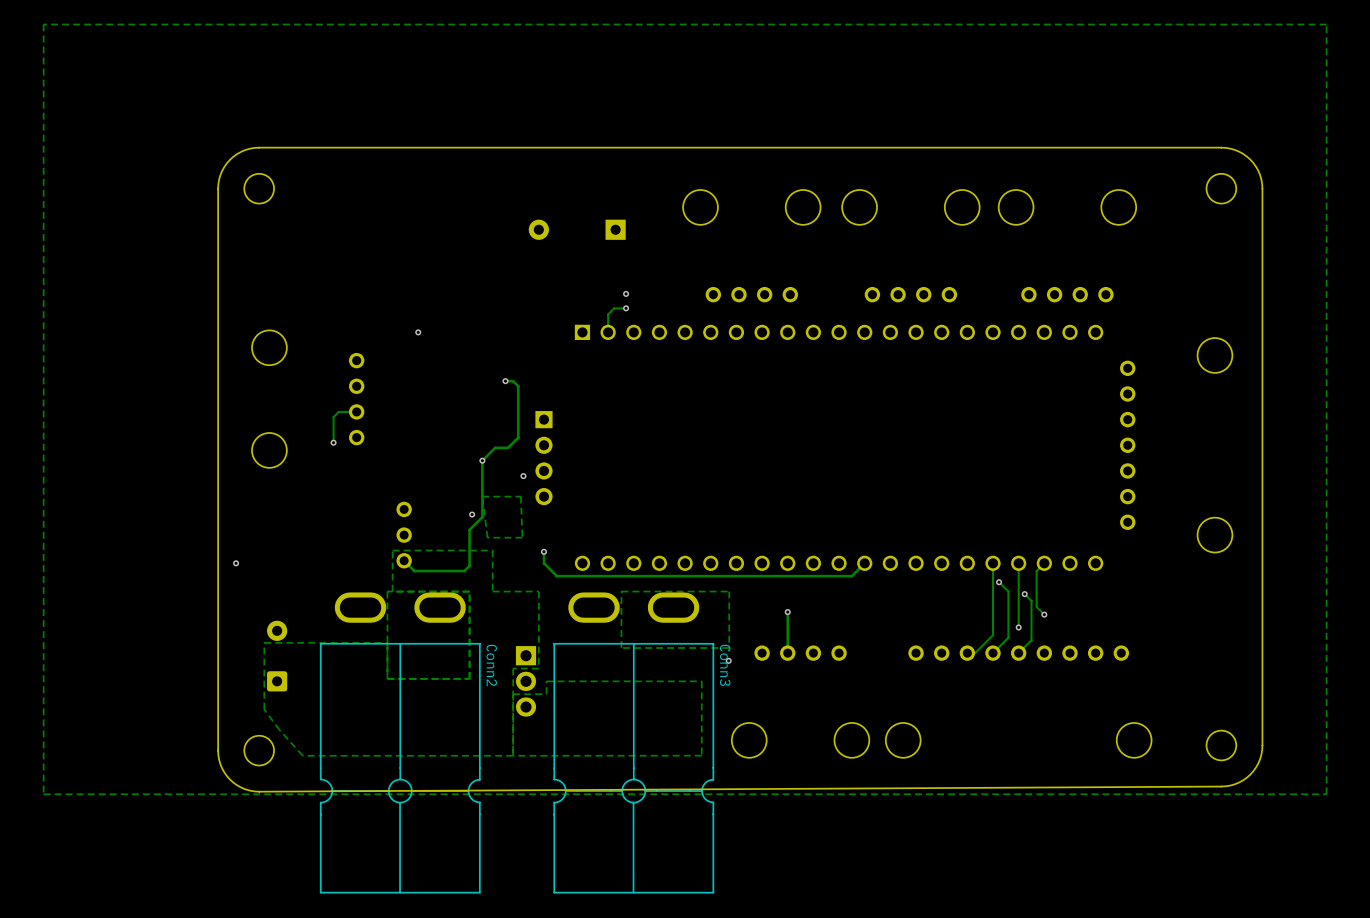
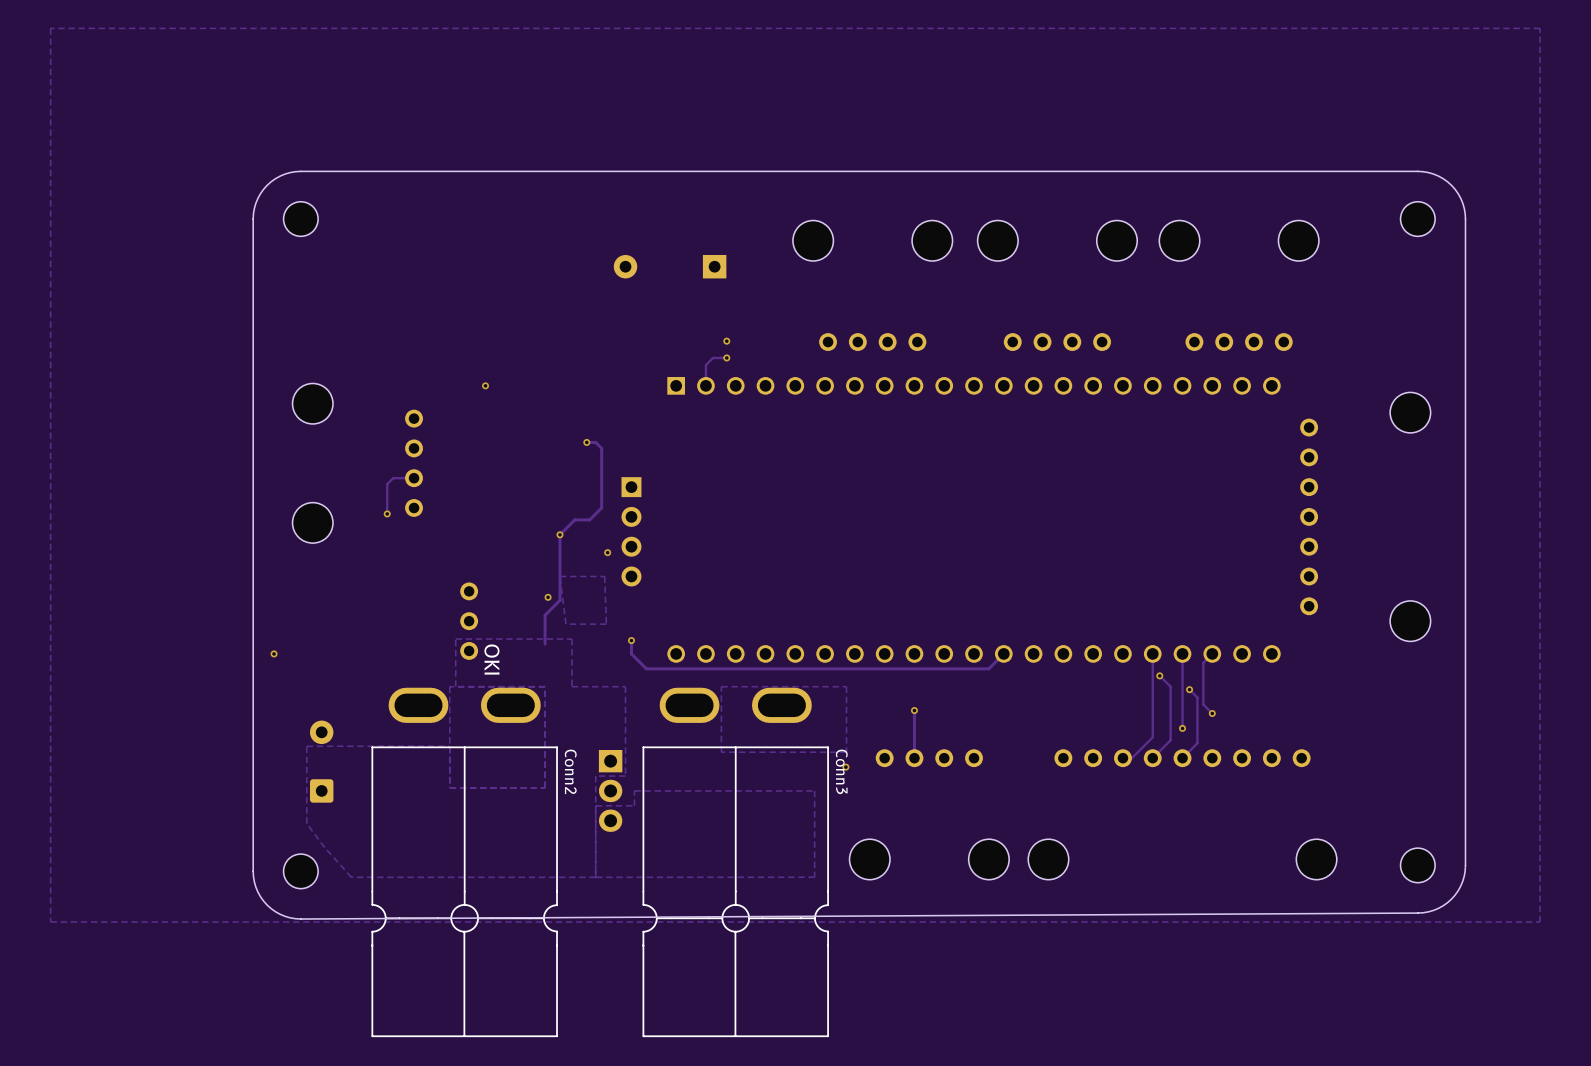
track: (469, 554) (469, 565) (464, 571) (414, 571) (404, 560) -> none
part value: none -> OKI (491, 659)

